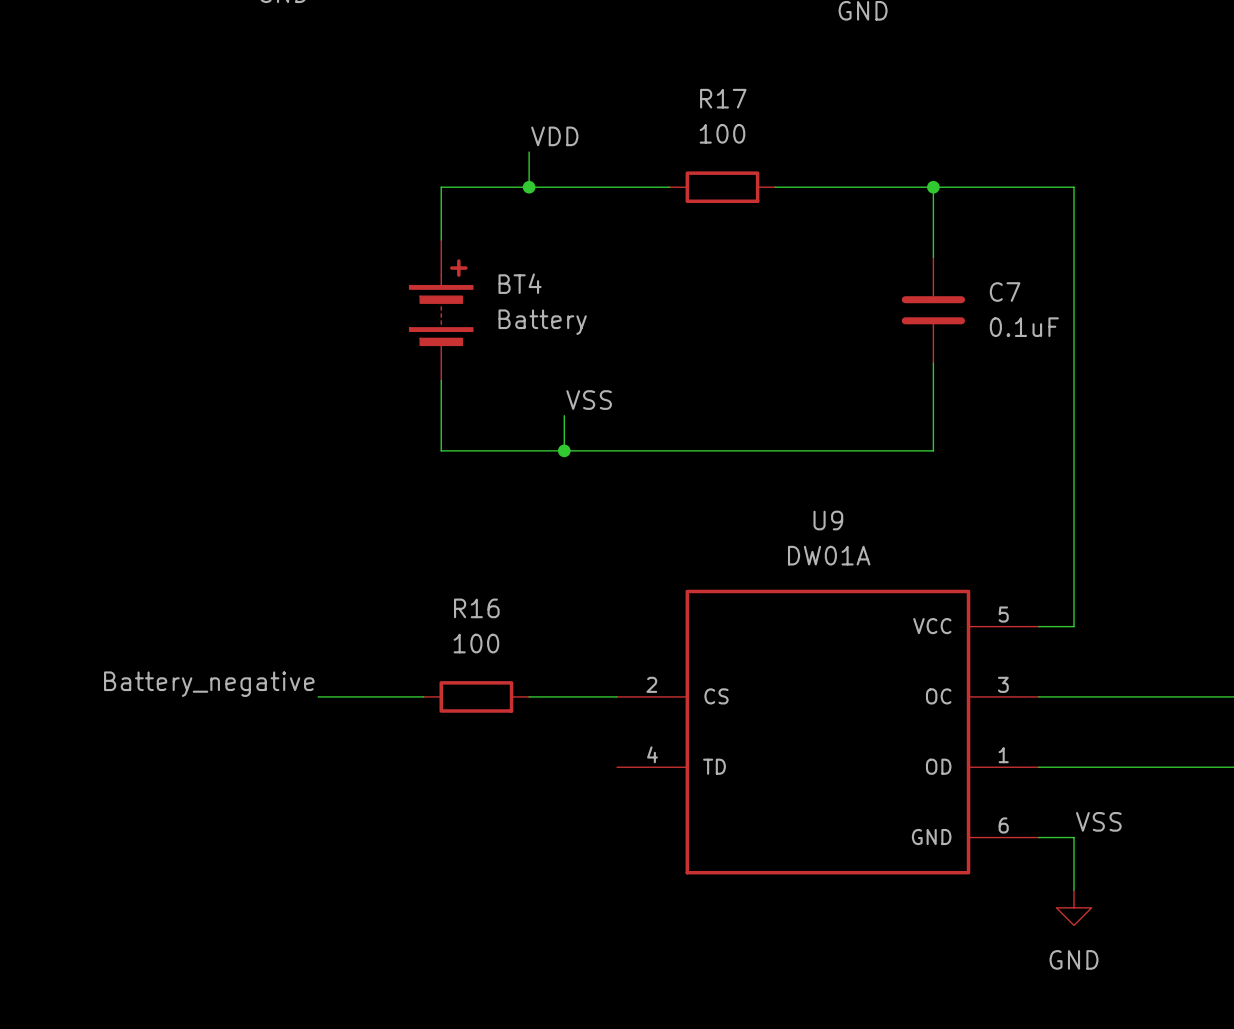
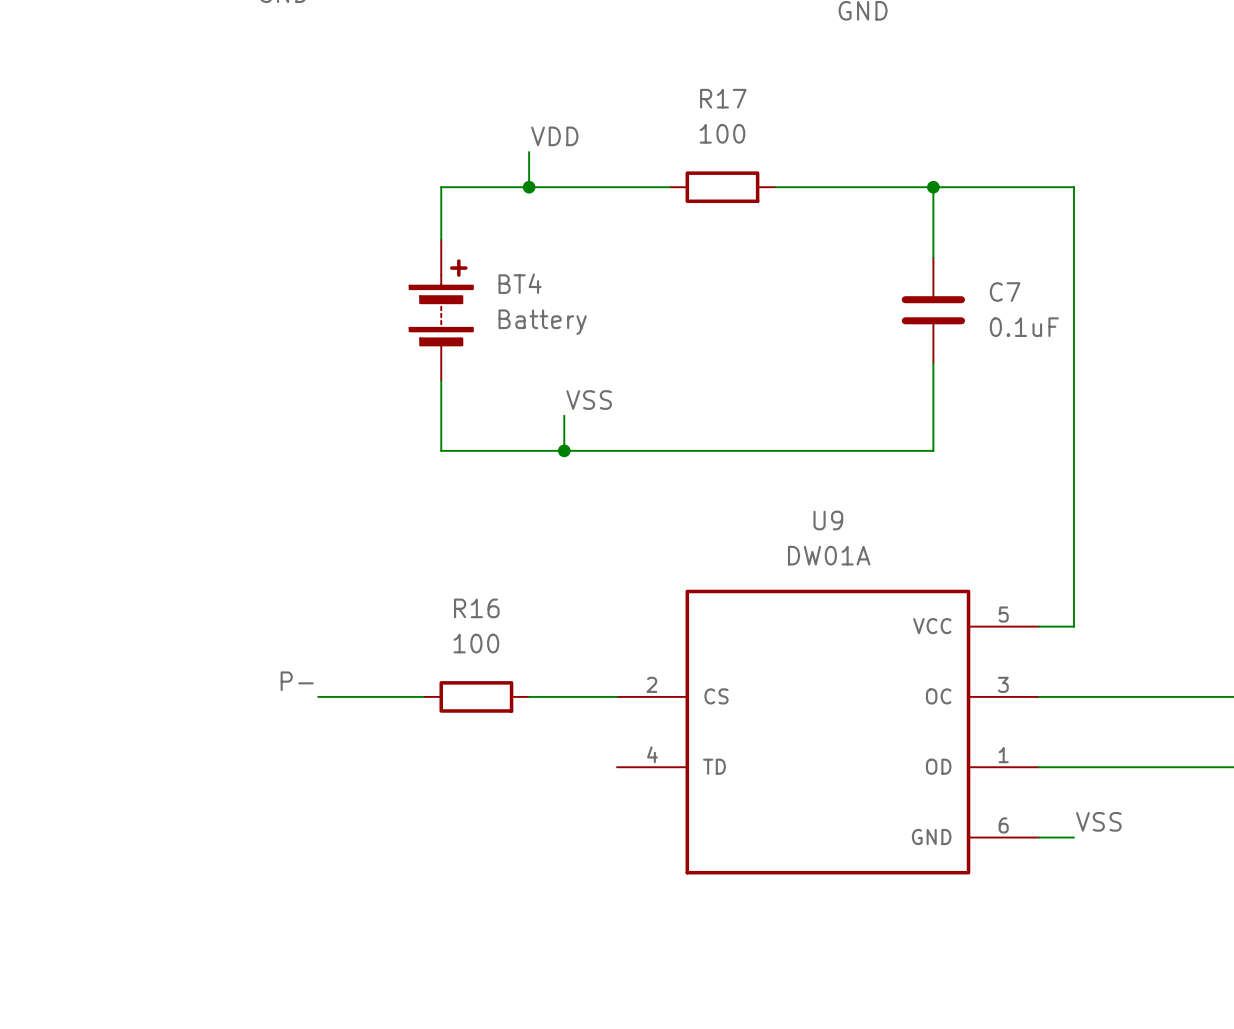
label: Battery_negative (209, 684) -> P- (297, 681)
wire: (1074, 837) (1074, 890) -> none
power symbol: GND (1074, 907) -> none

